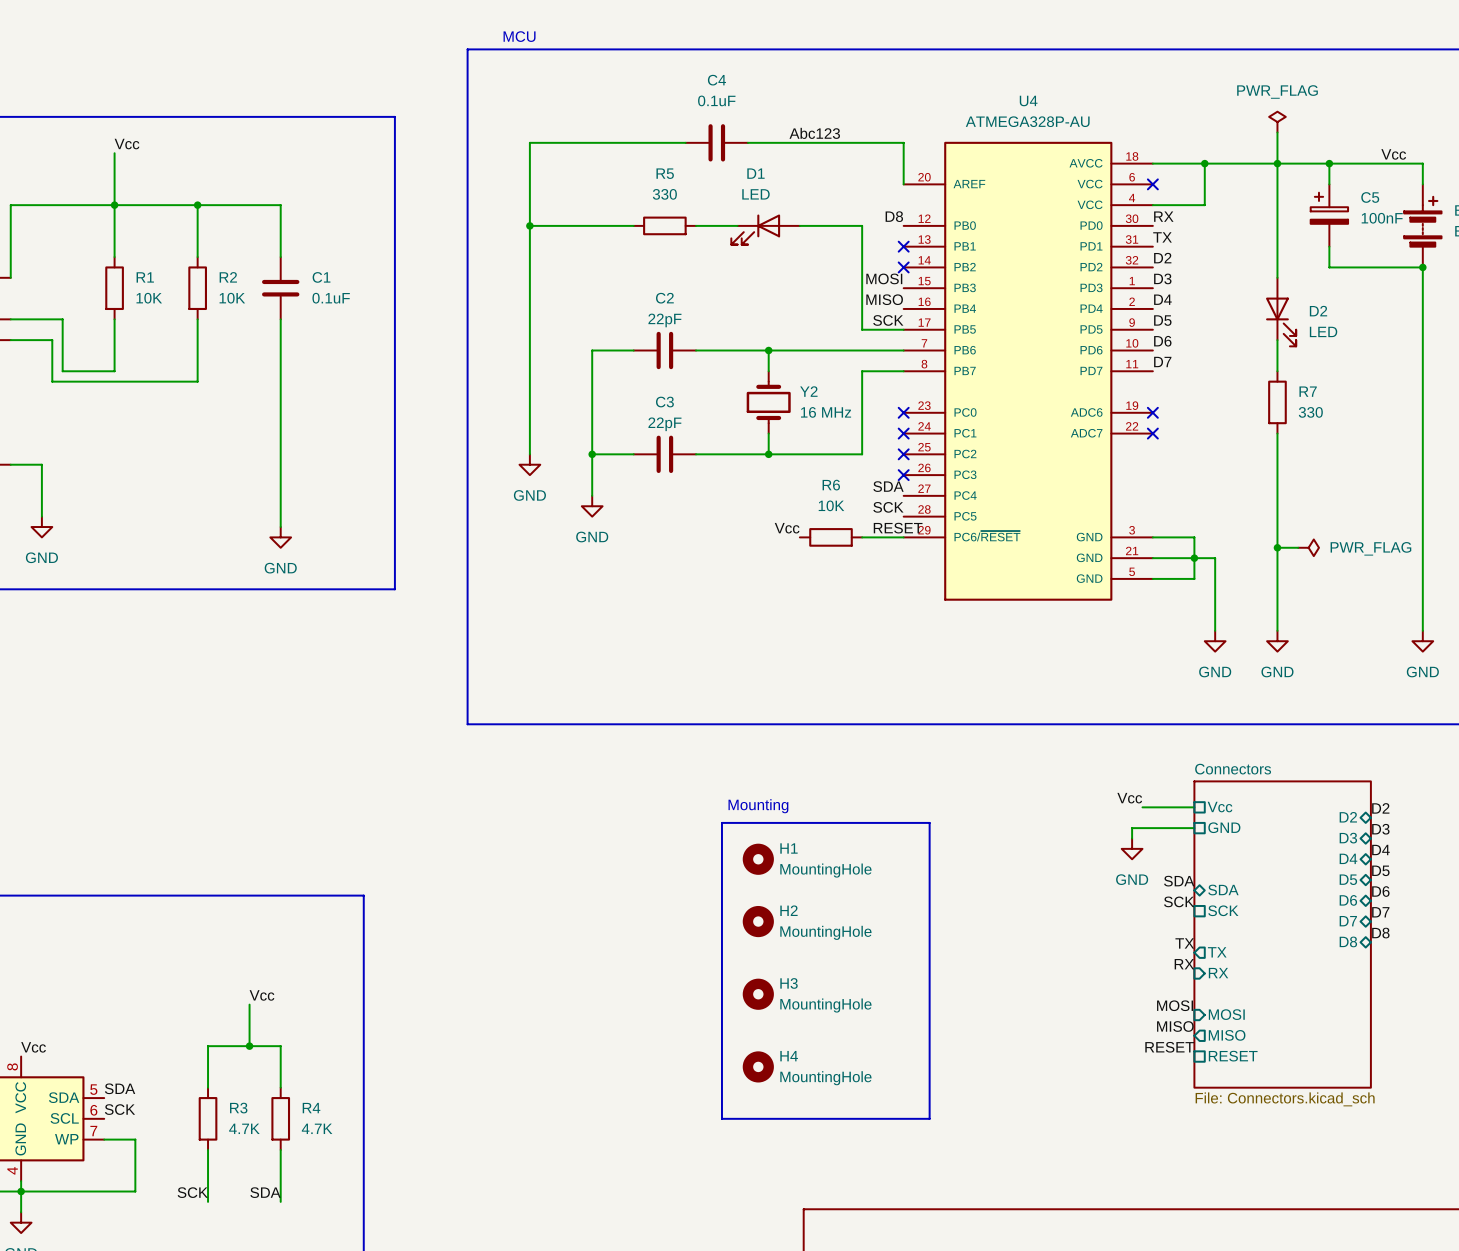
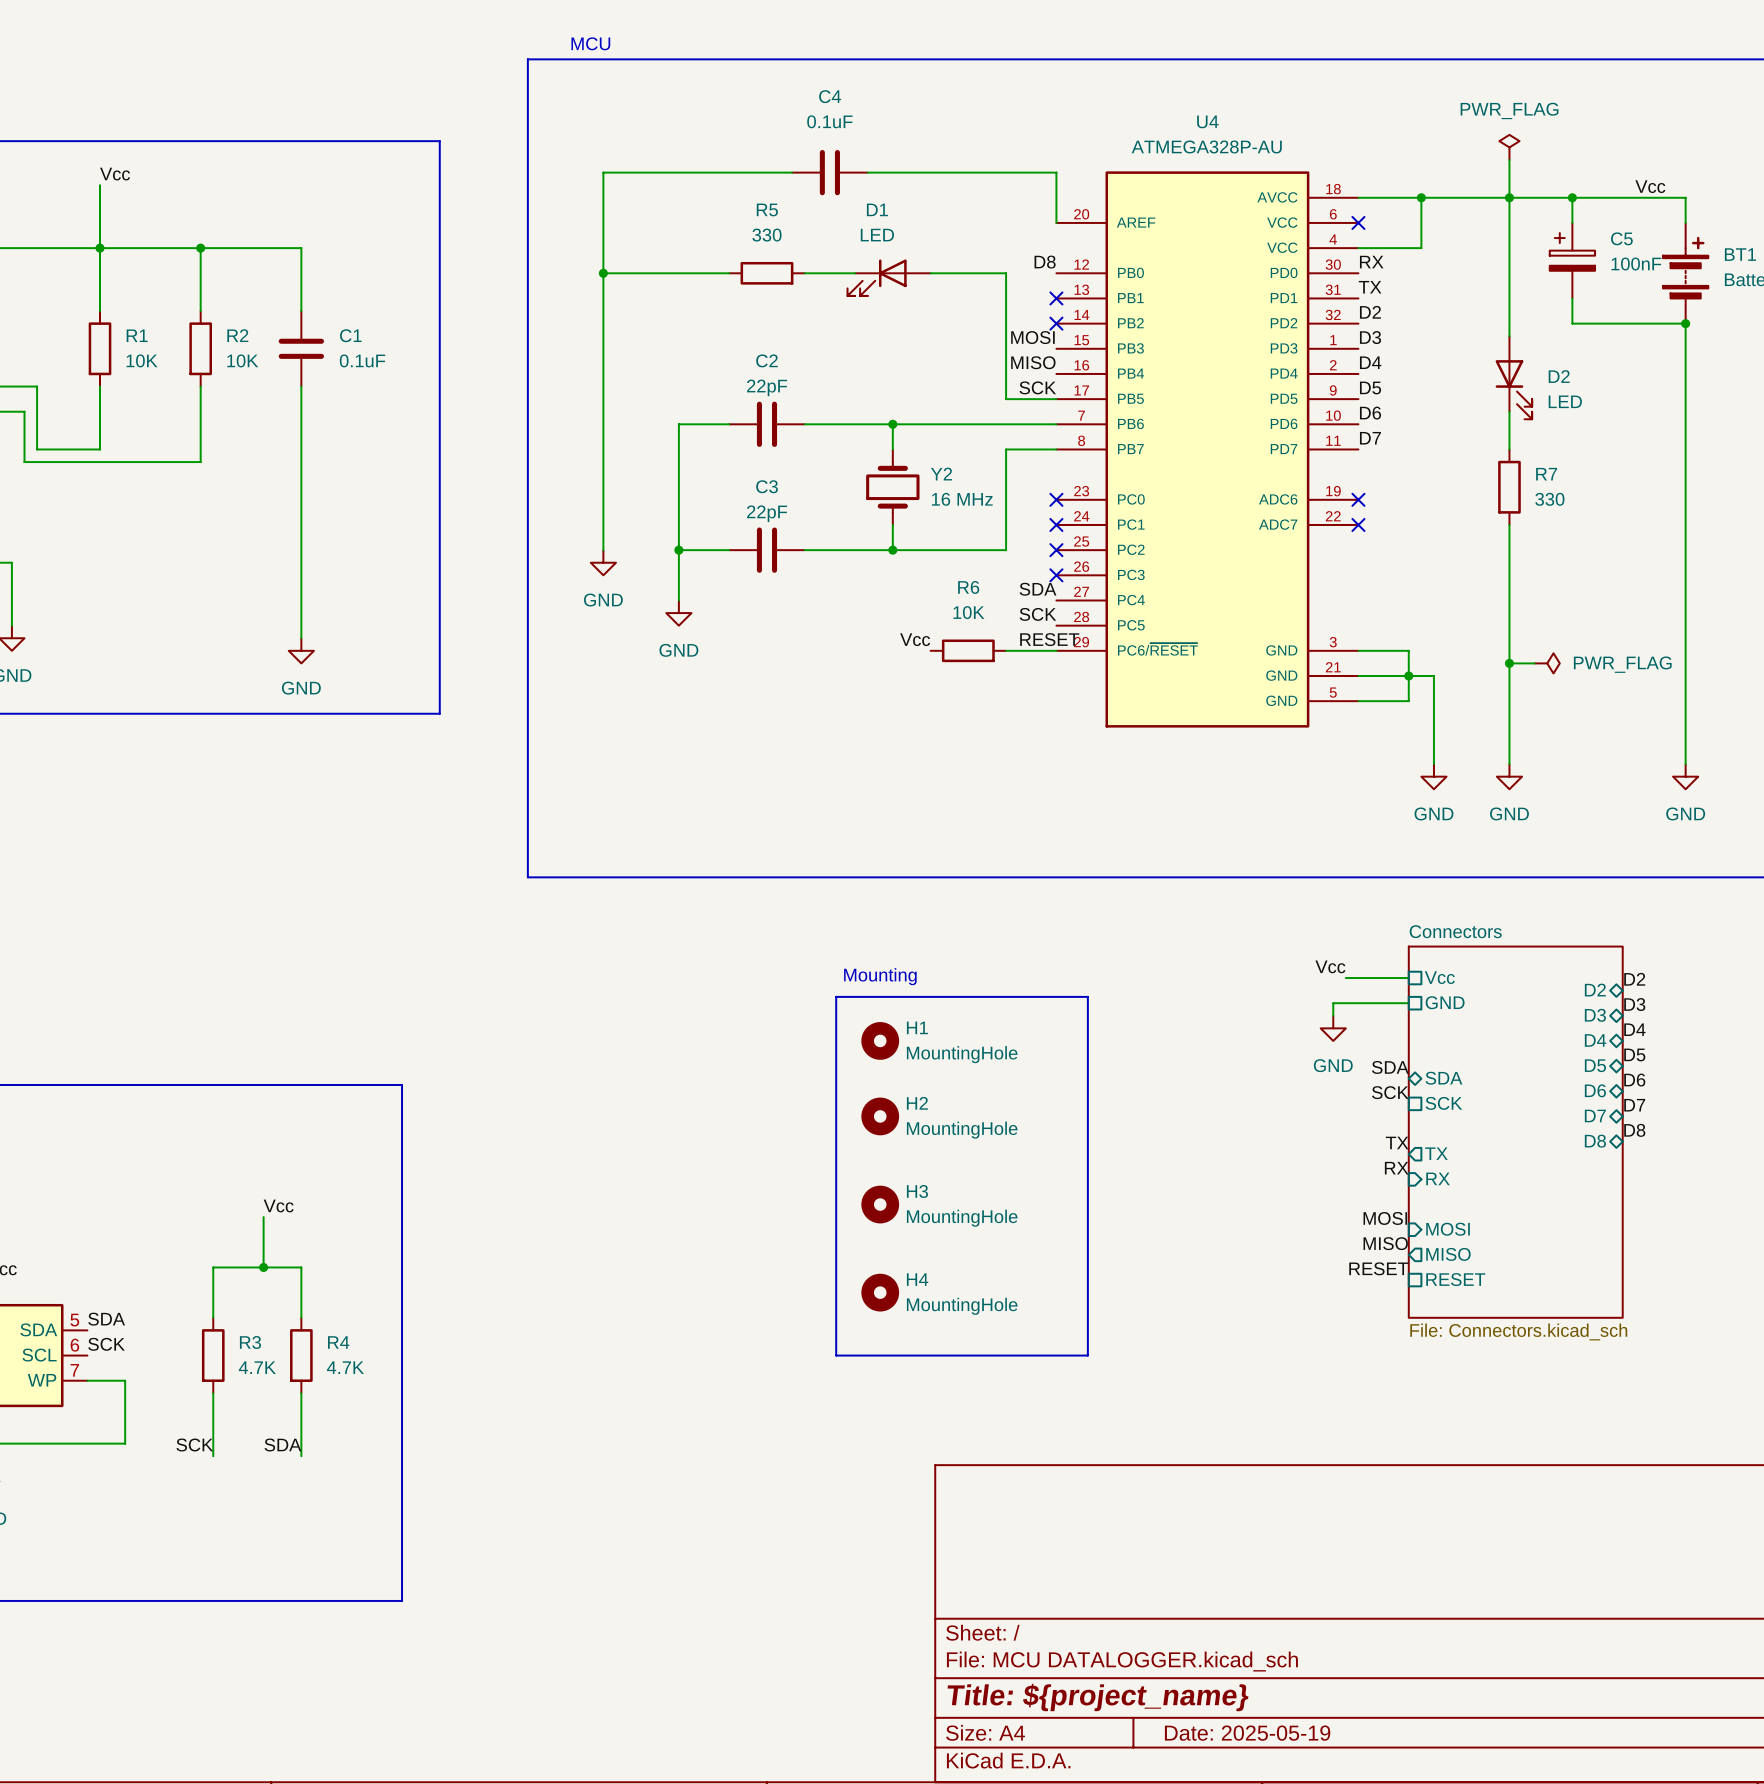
label: Abc123 (814, 133) -> none

